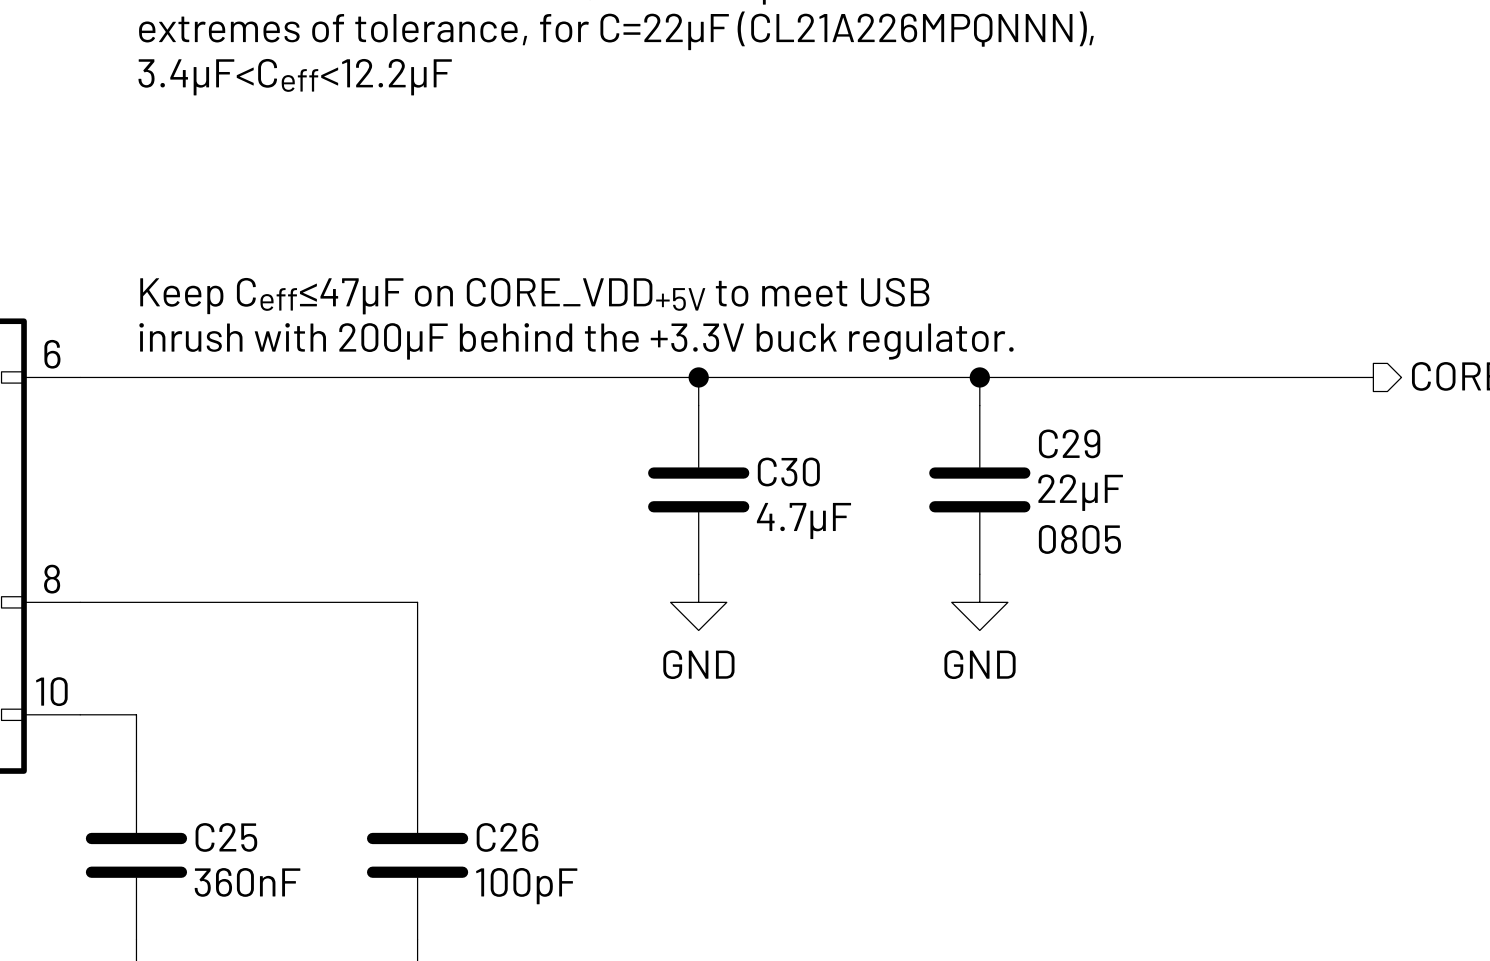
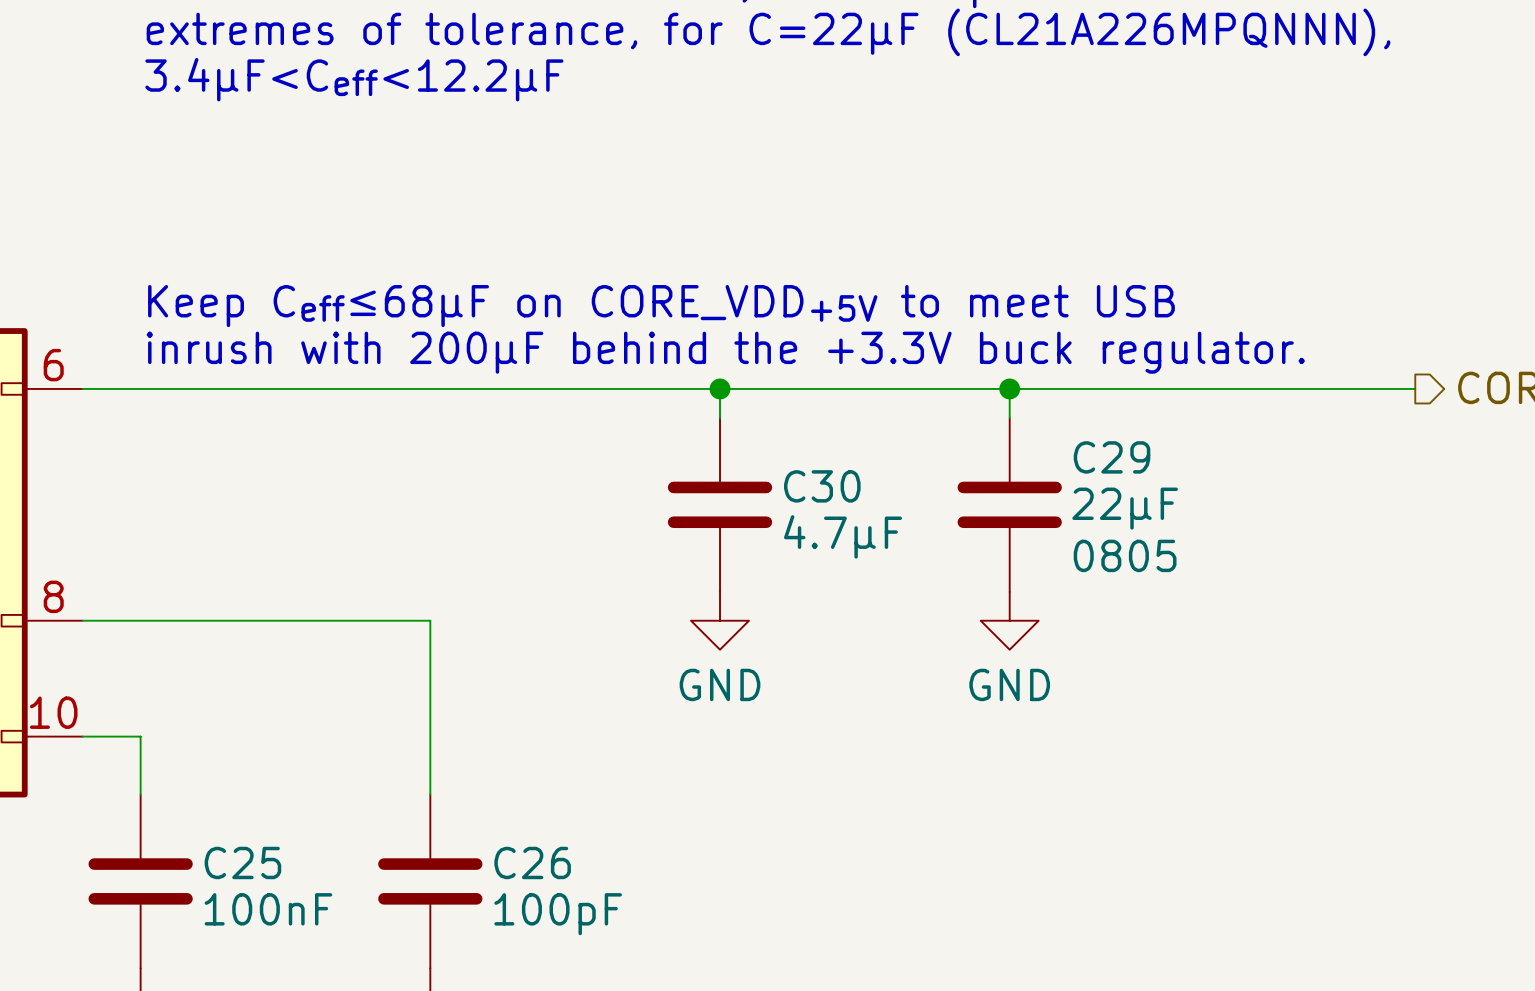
text: Keep Ceff≤47μF on CORE_VDD+5V to meet USB (534, 296) -> Keep Ceff≤68μF on CORE_VDD+5V to meet USB (661, 306)
C25 value: 360nF (247, 882) -> 100nF (268, 909)

